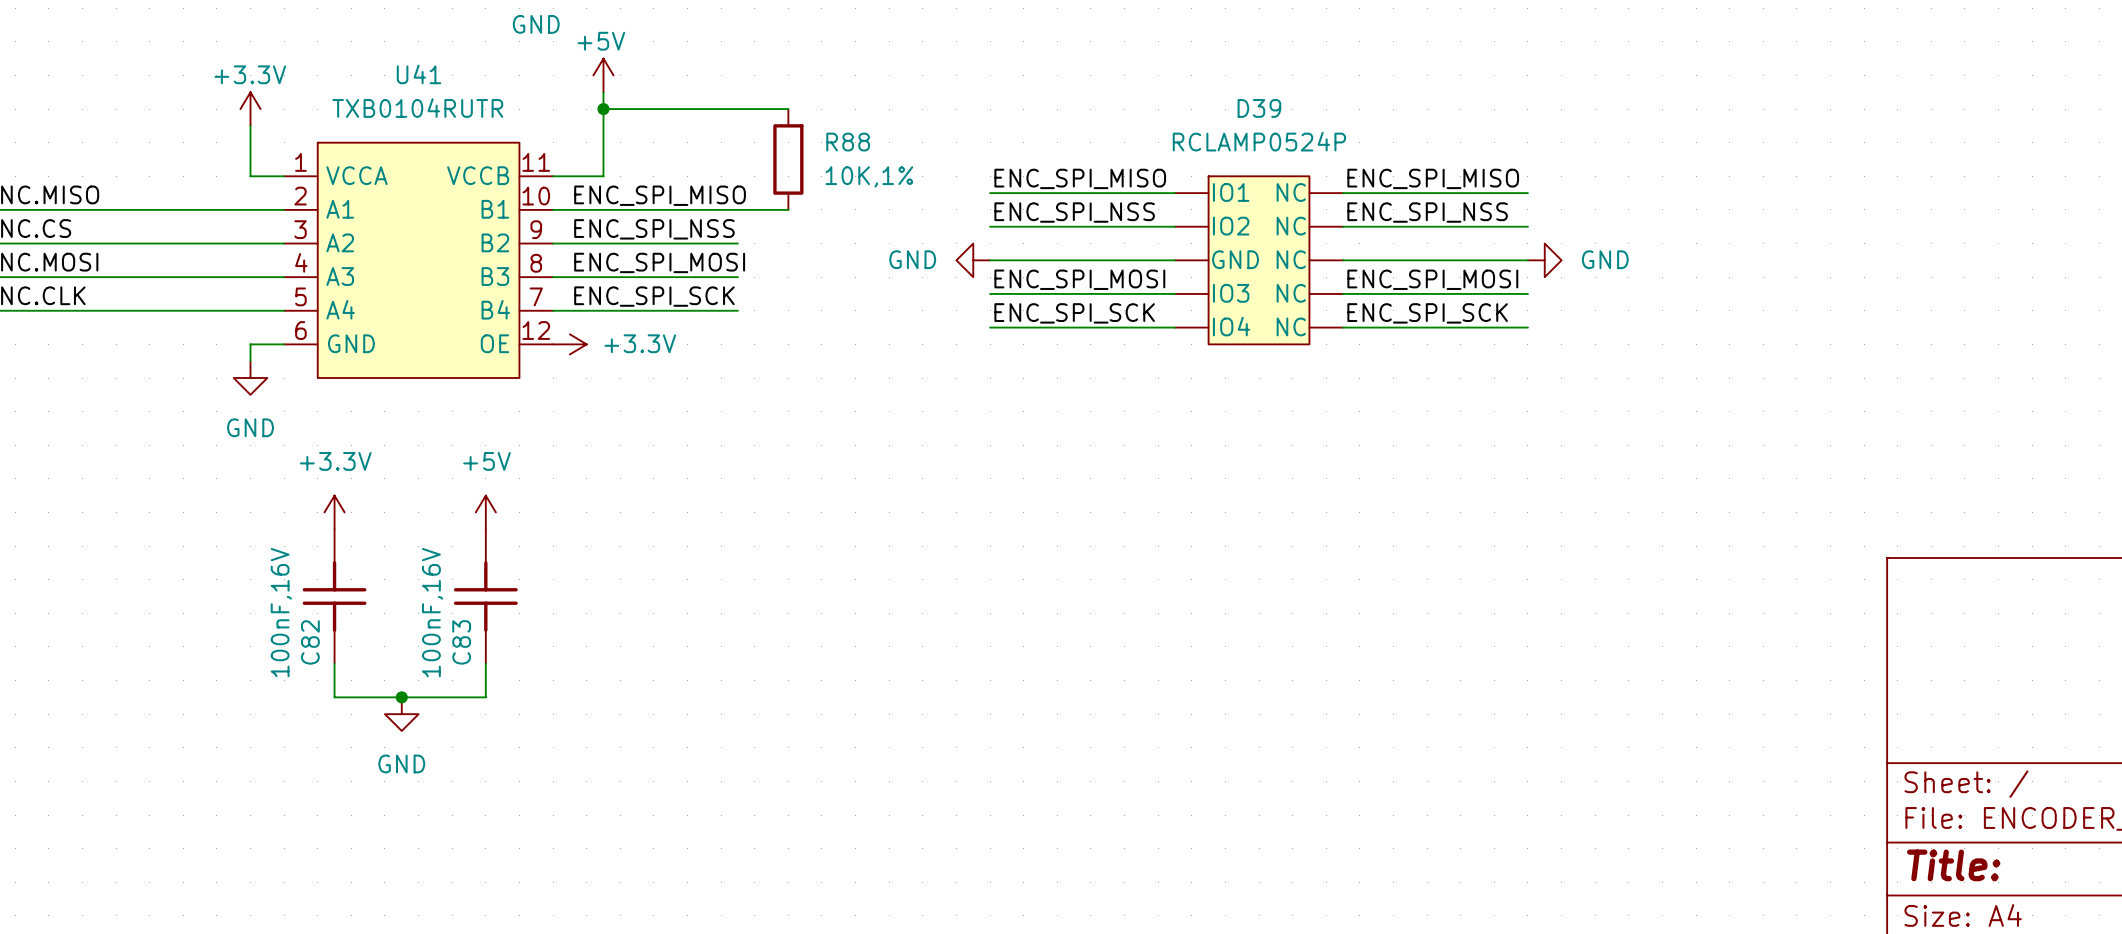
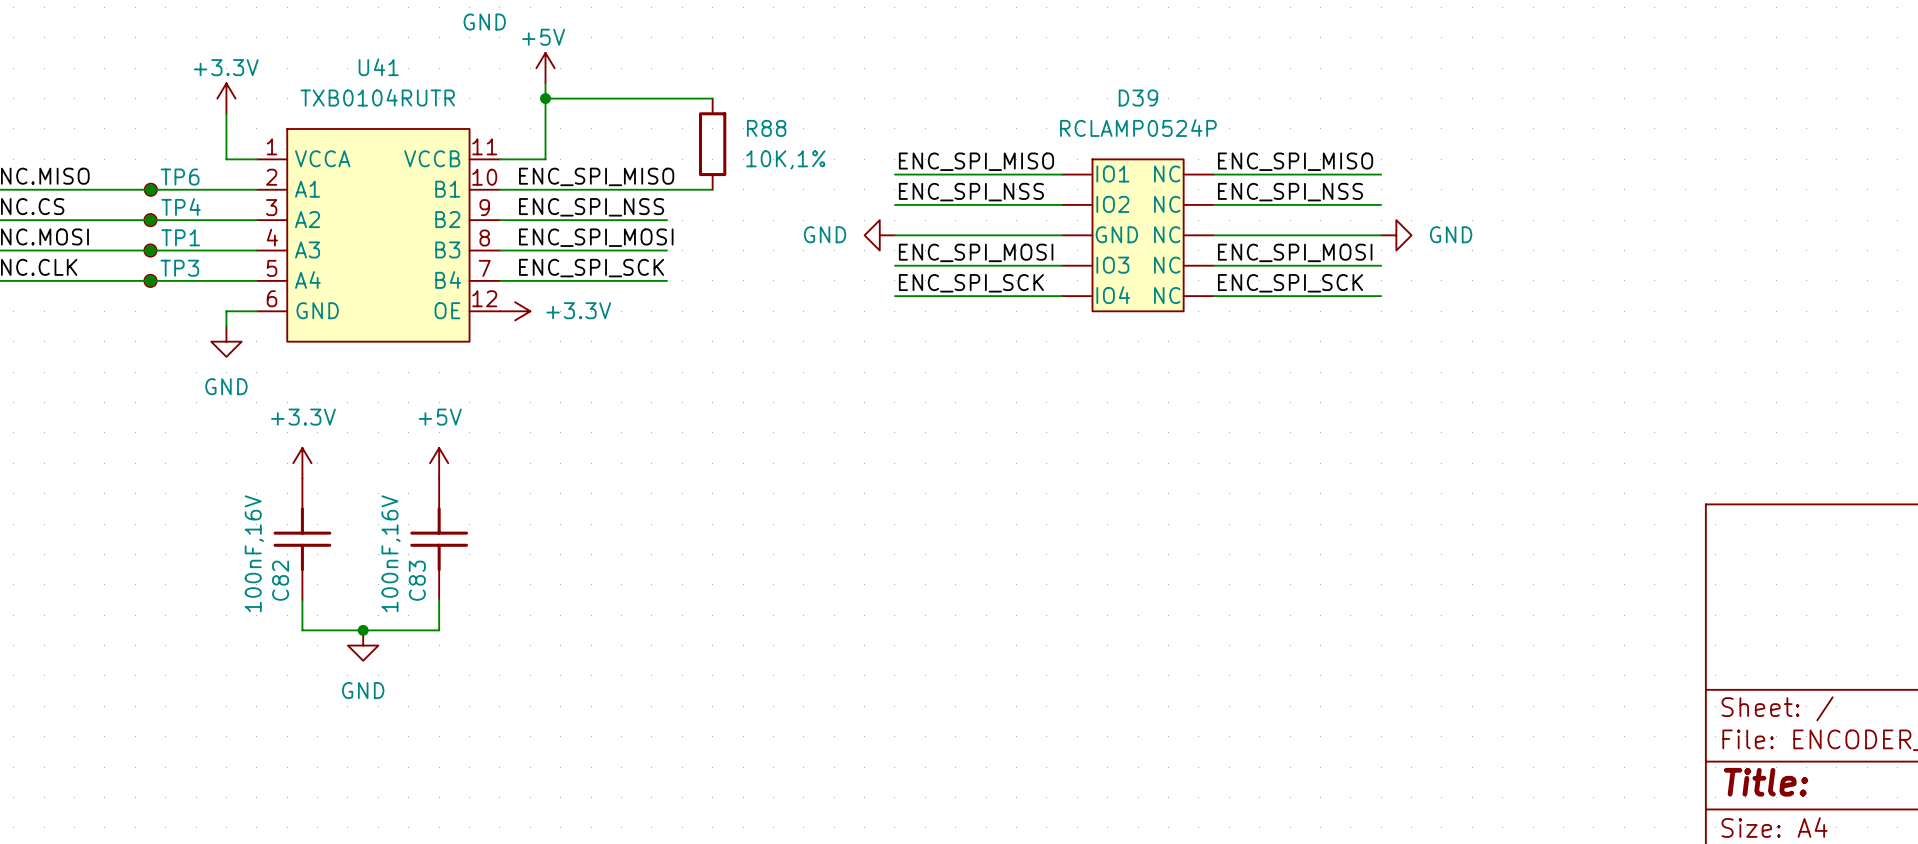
junction: none -> (150, 189)
TP6: none -> (150, 189)
junction: none -> (150, 220)
TP4: none -> (150, 220)
junction: none -> (150, 250)
TP1: none -> (150, 250)
junction: none -> (150, 280)
TP3: none -> (150, 280)

